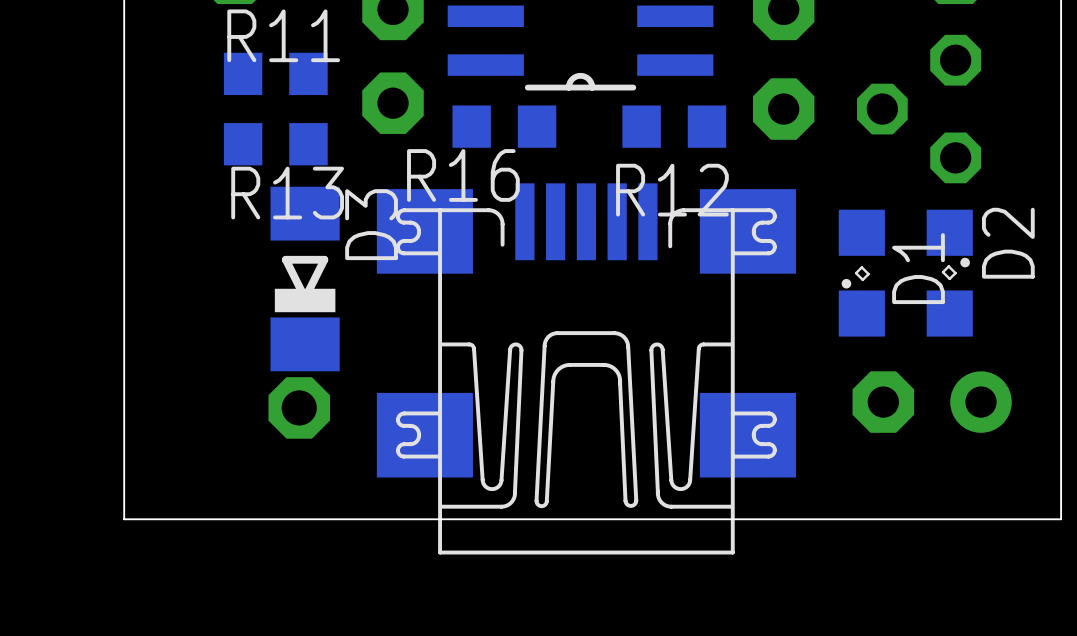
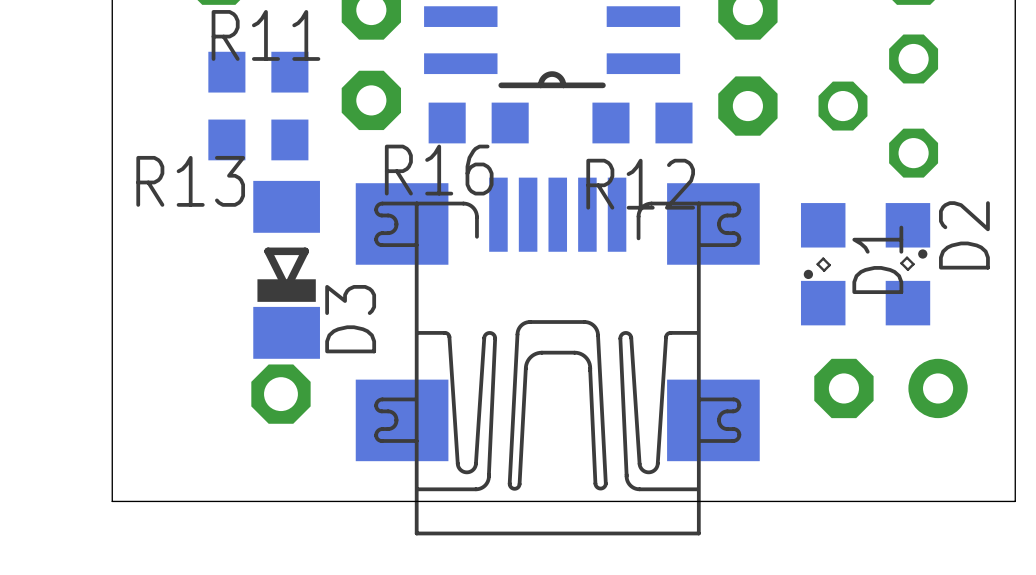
R13 name position: R13 (287, 193) -> R13 (190, 181)
D3 name position: D3 (371, 224) -> D3 (350, 319)

